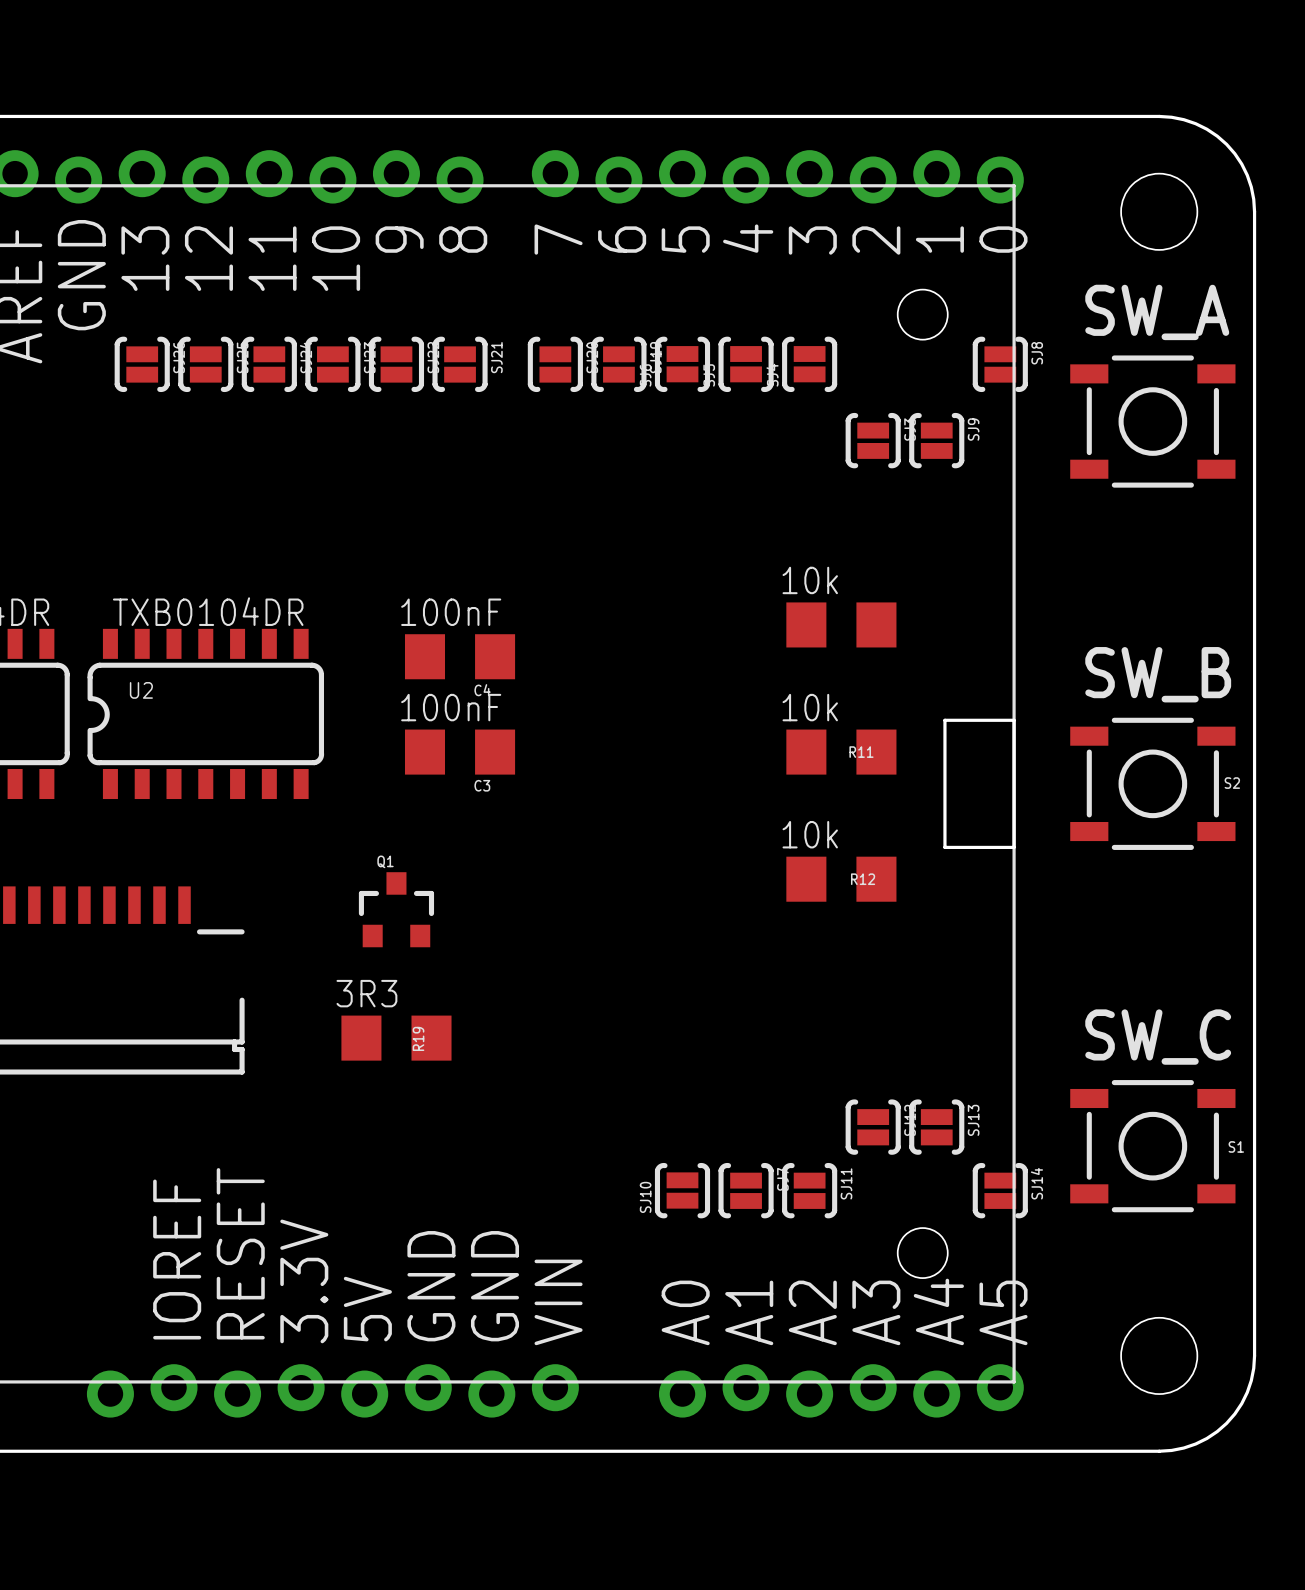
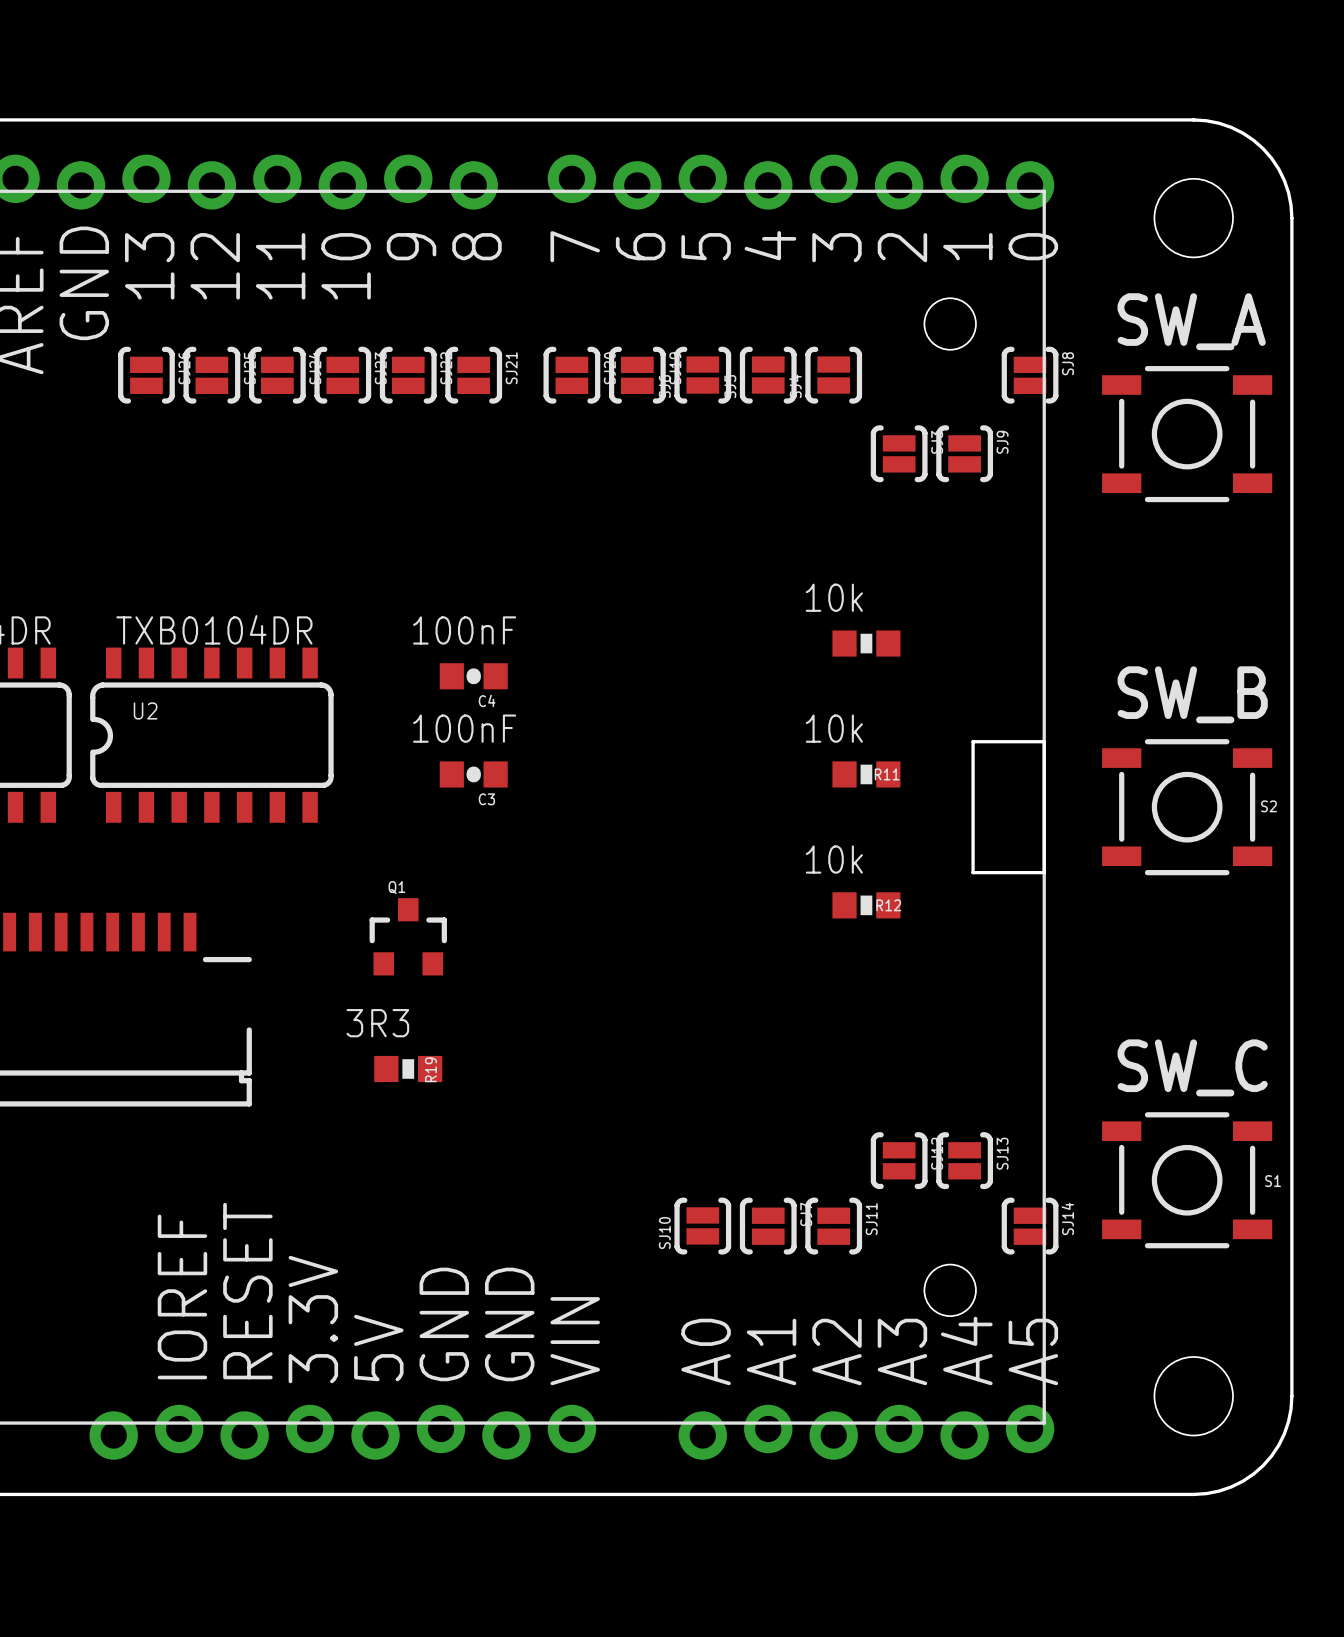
part footprint: [786, 602, 897, 648] -> [832, 630, 901, 657]
C4 footprint: [404, 634, 516, 680] -> [439, 663, 508, 690]
C3 footprint: [404, 729, 516, 775] -> [439, 761, 508, 788]
R11 footprint: [786, 729, 897, 775] -> [832, 761, 901, 788]
R12 footprint: [786, 856, 897, 902] -> [832, 892, 901, 919]
R19 footprint: [341, 1015, 452, 1061] -> [374, 1055, 443, 1083]

